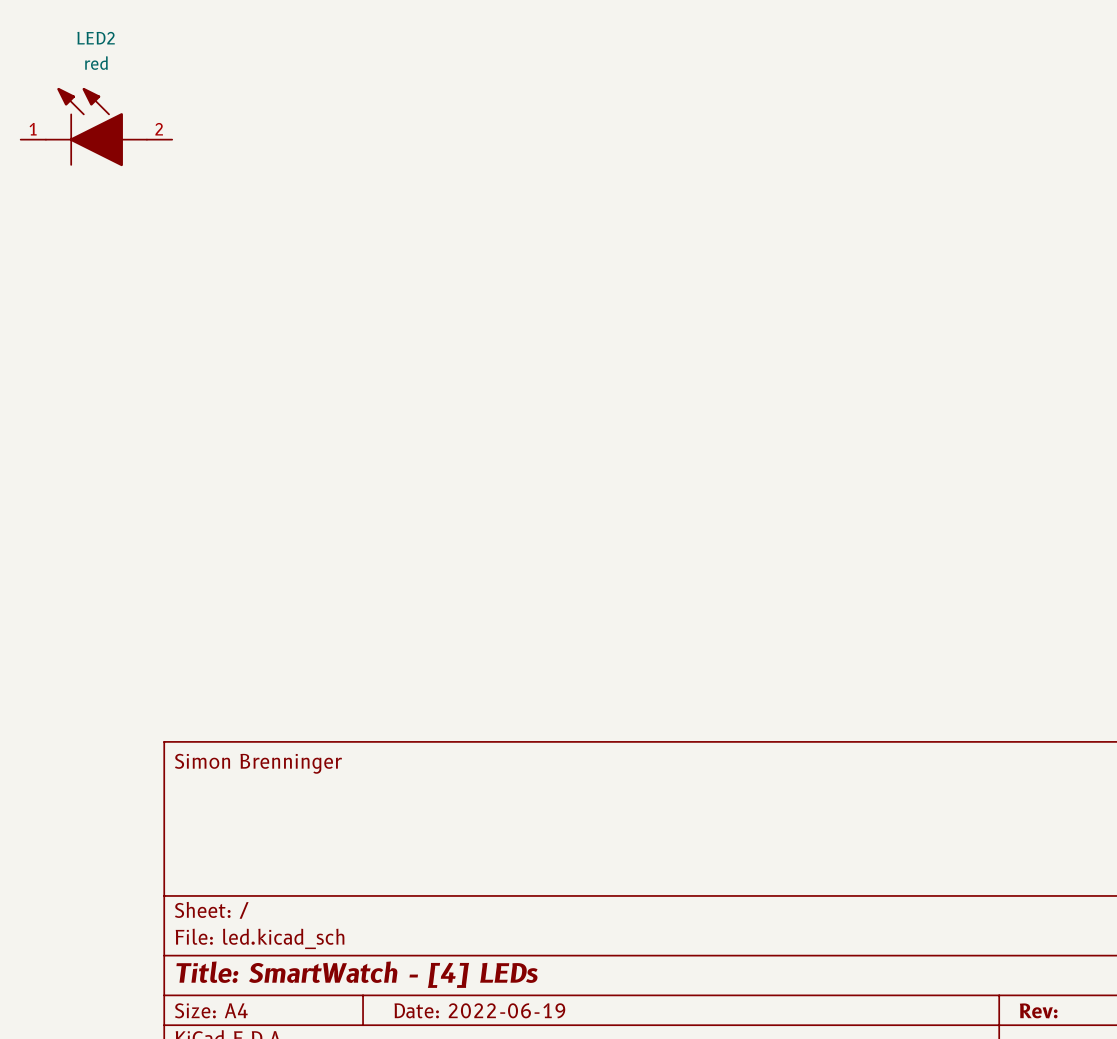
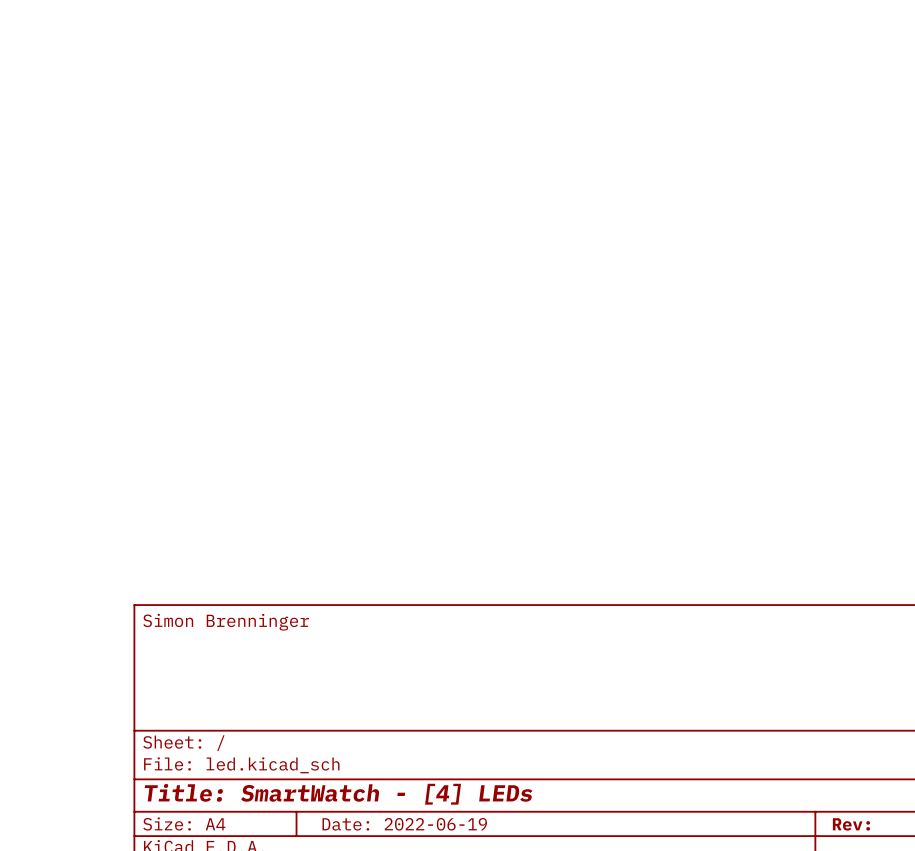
LED2: red (96, 127) -> none

